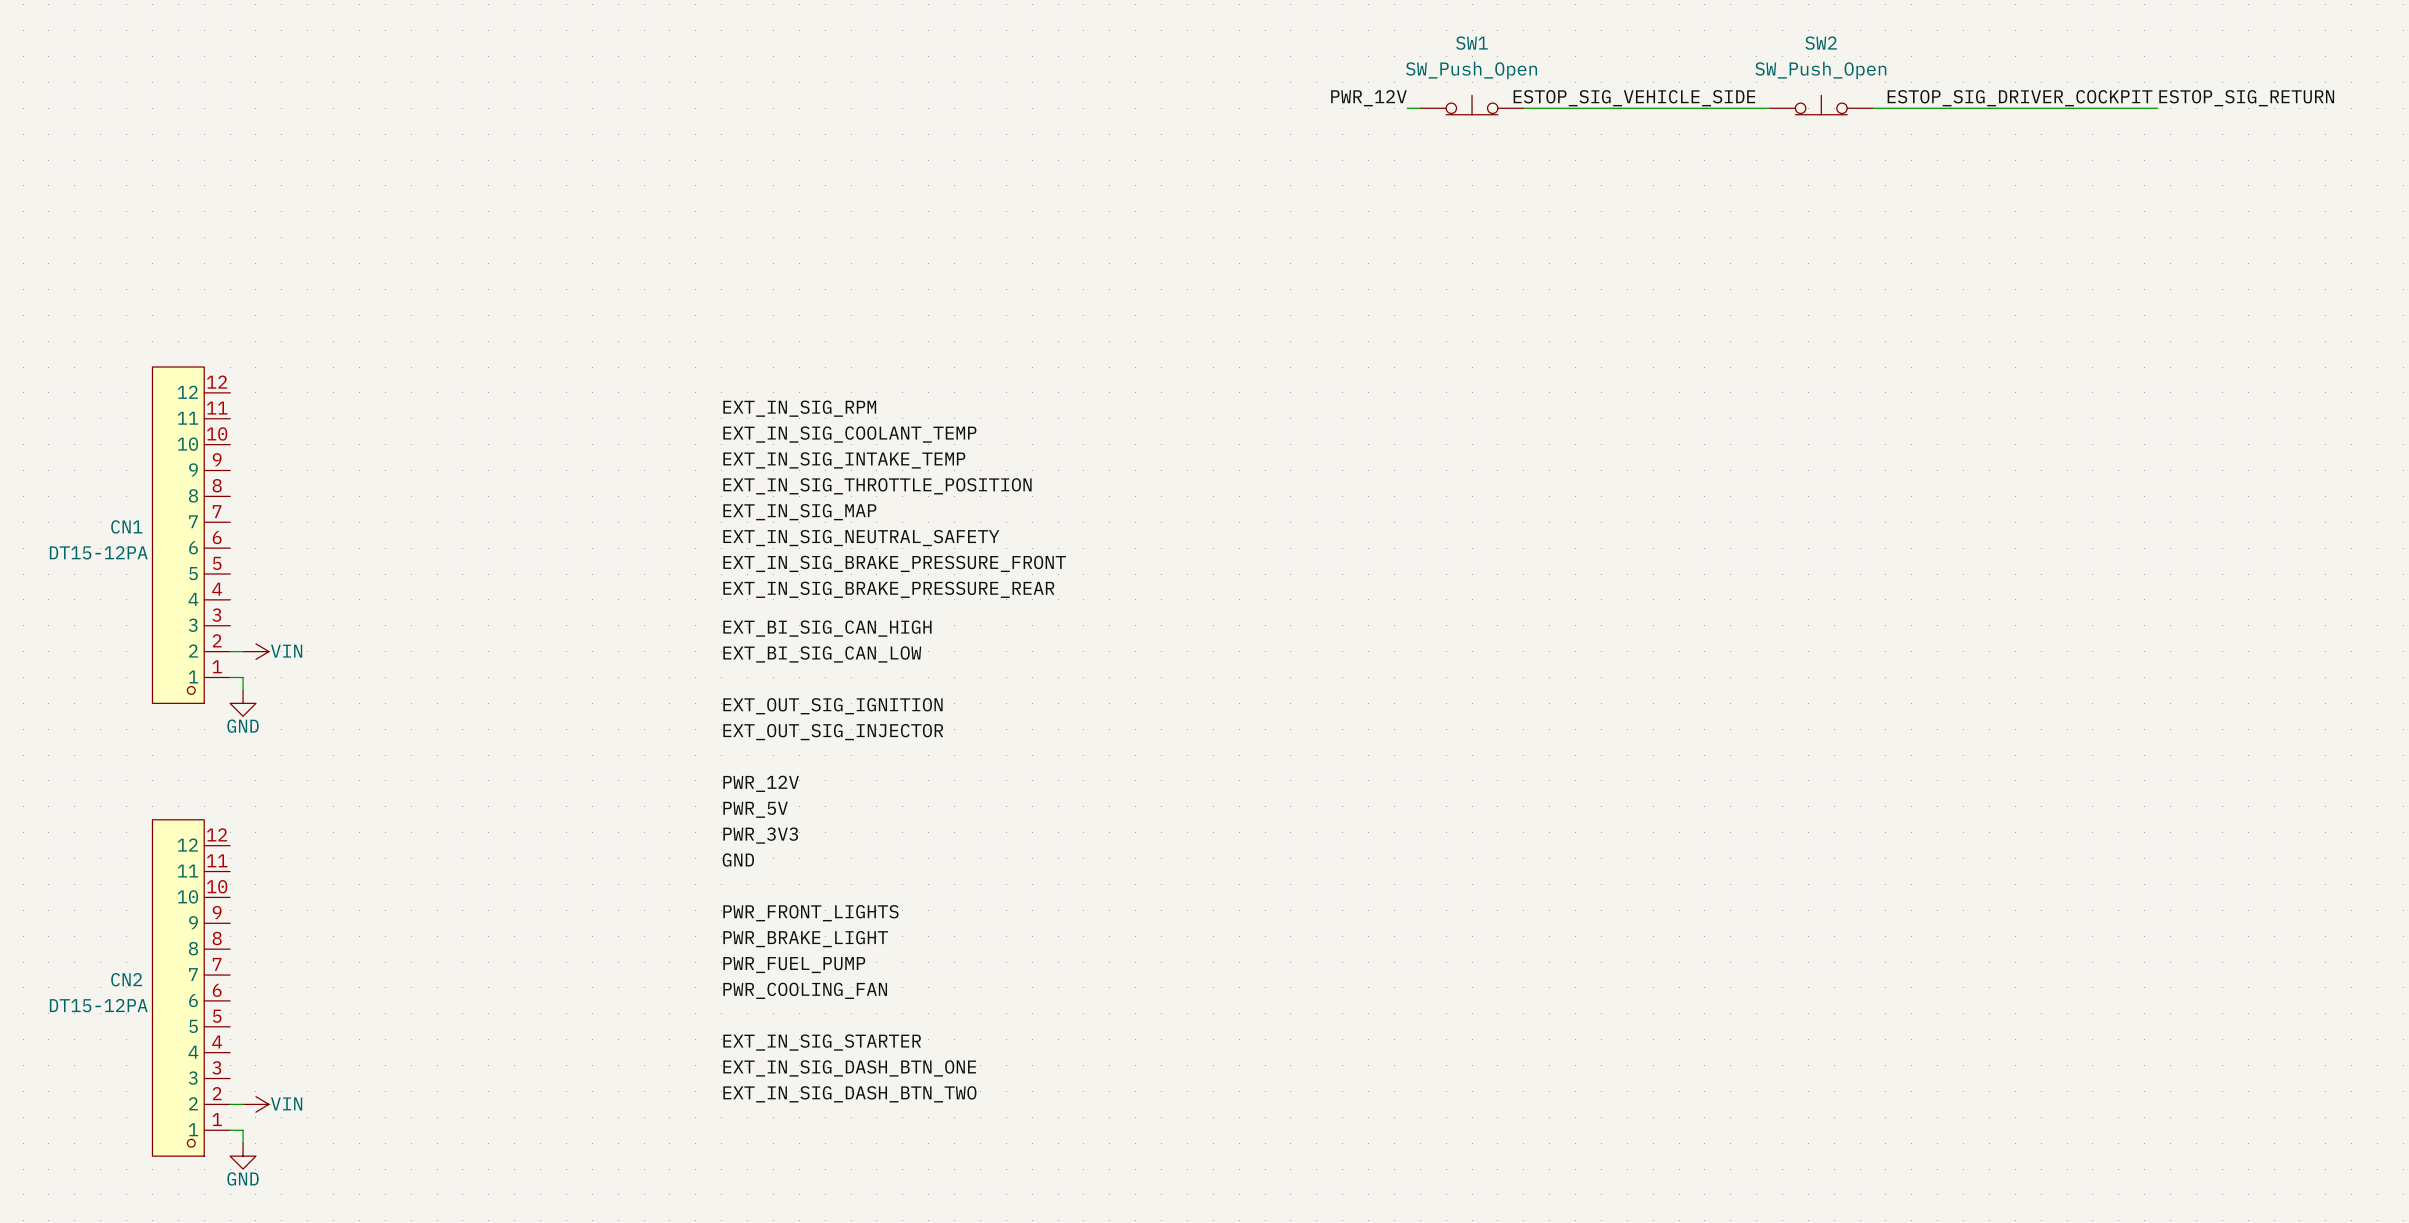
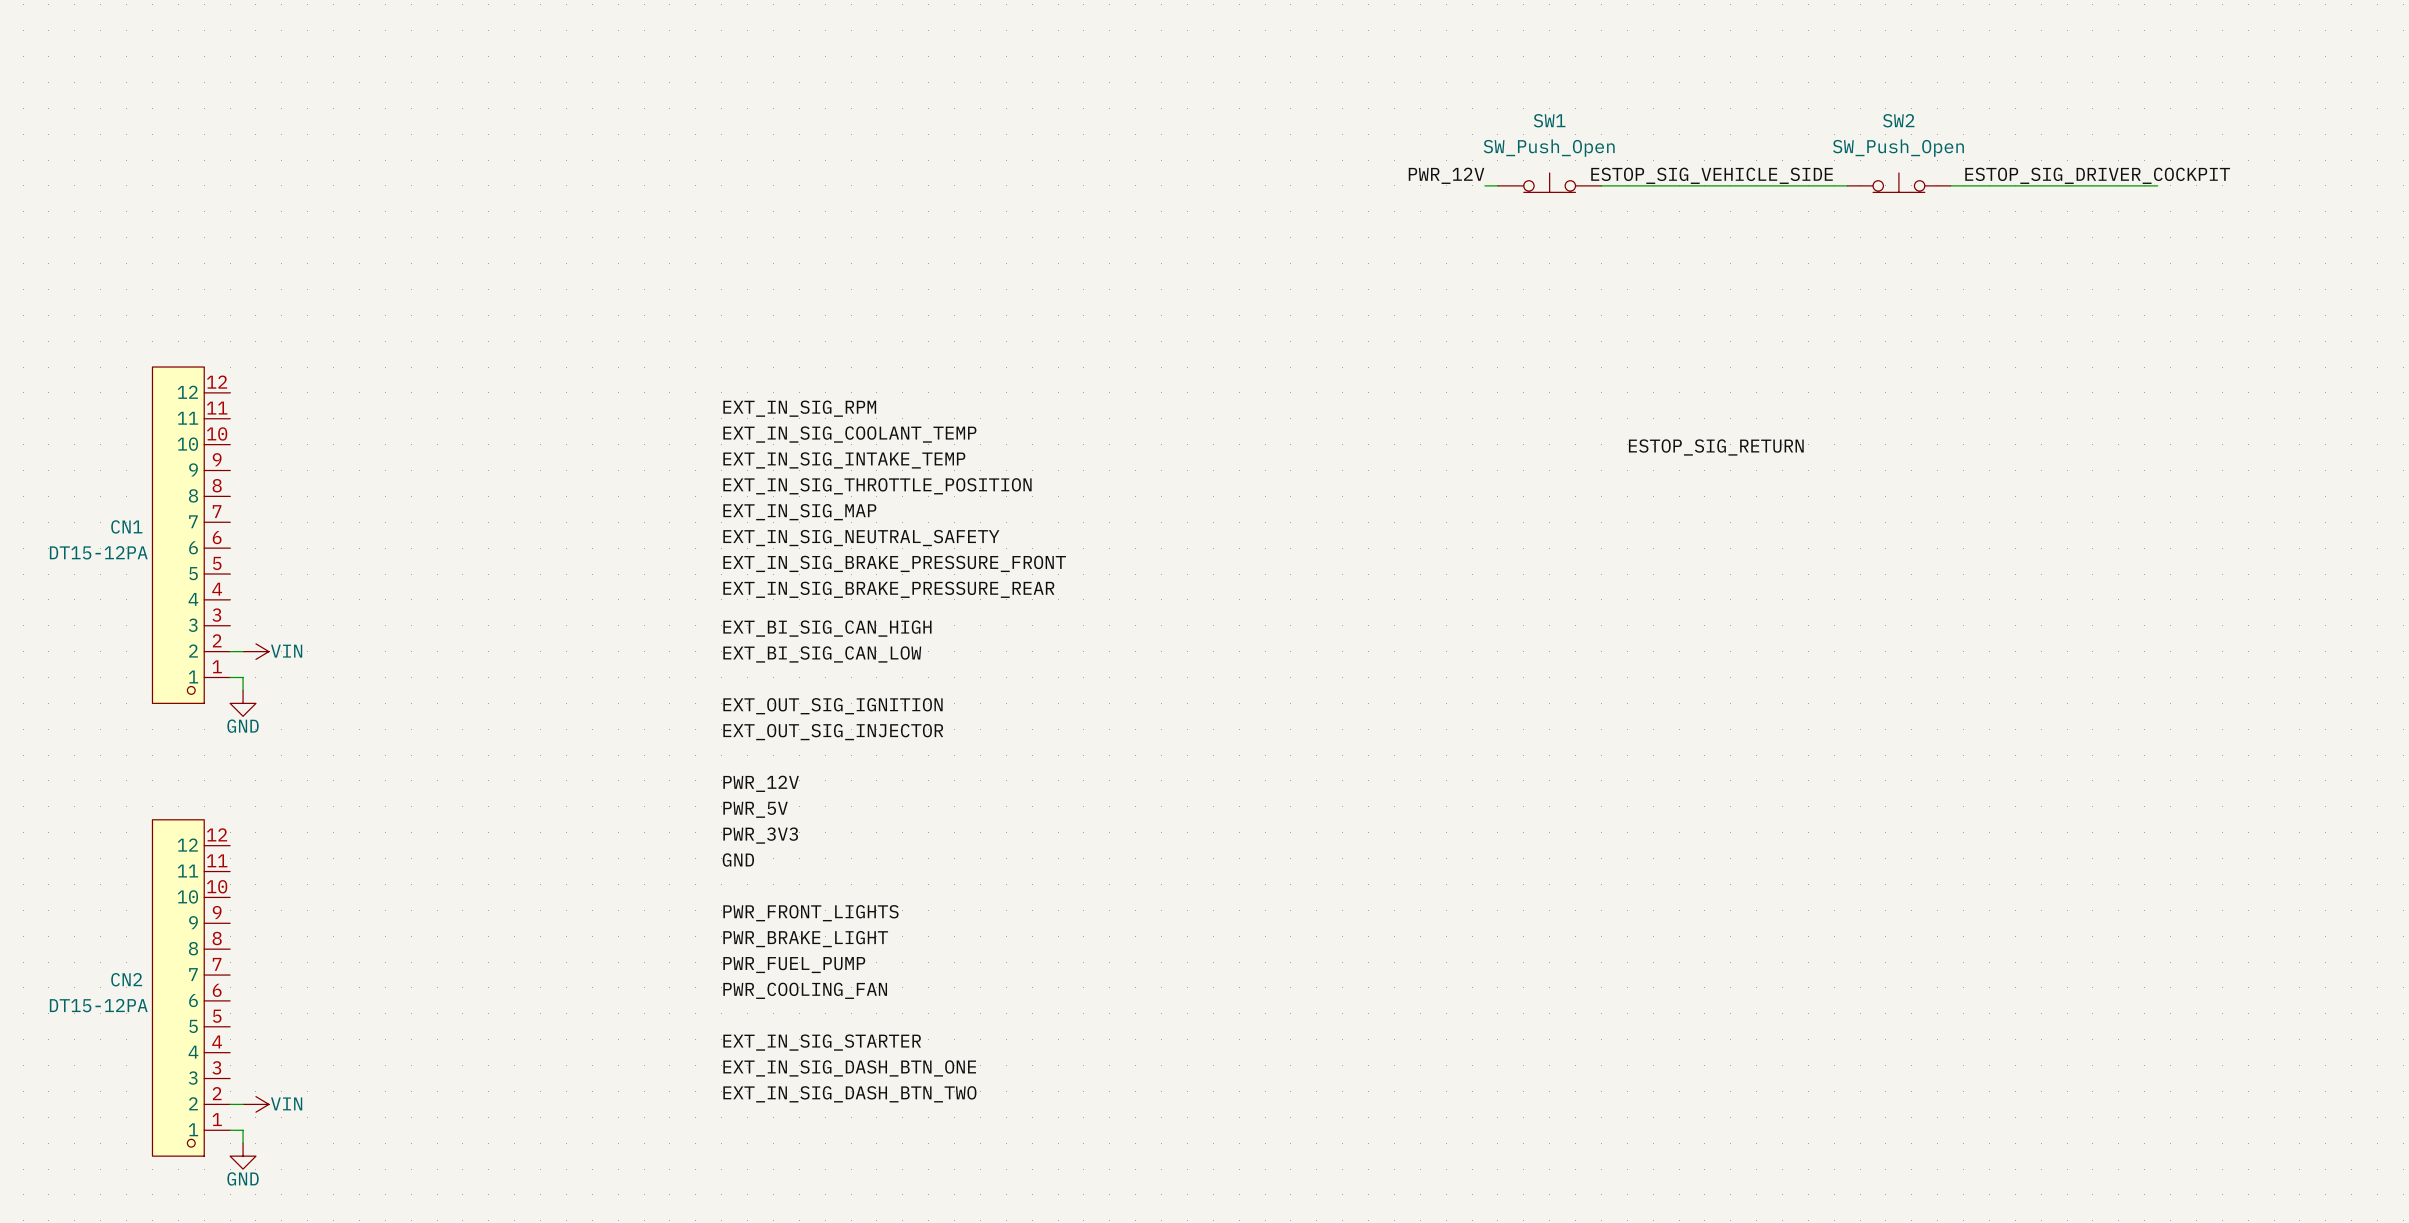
label position: PWR_12V (1368, 98) -> PWR_12V (1446, 175)
label position: ESTOP_SIG_VEHICLE_SIDE (1634, 98) -> ESTOP_SIG_VEHICLE_SIDE (1712, 175)
label position: ESTOP_SIG_DRIVER_COCKPIT (2020, 98) -> ESTOP_SIG_DRIVER_COCKPIT (2097, 175)
label: ESTOP_SIG_RETURN (2246, 98) -> none
SW1 position: (1472, 105) -> (1549, 182)
SW2 position: (1821, 105) -> (1898, 182)
wire: (1407, 108) (1420, 108) -> (1484, 185) (1497, 185)
wire: (1523, 108) (1769, 108) -> (1601, 185) (1847, 185)
wire: (1873, 108) (2157, 108) -> none
wire: none -> (1950, 185) (2157, 185)
label: none -> ESTOP_SIG_RETURN (1716, 447)

